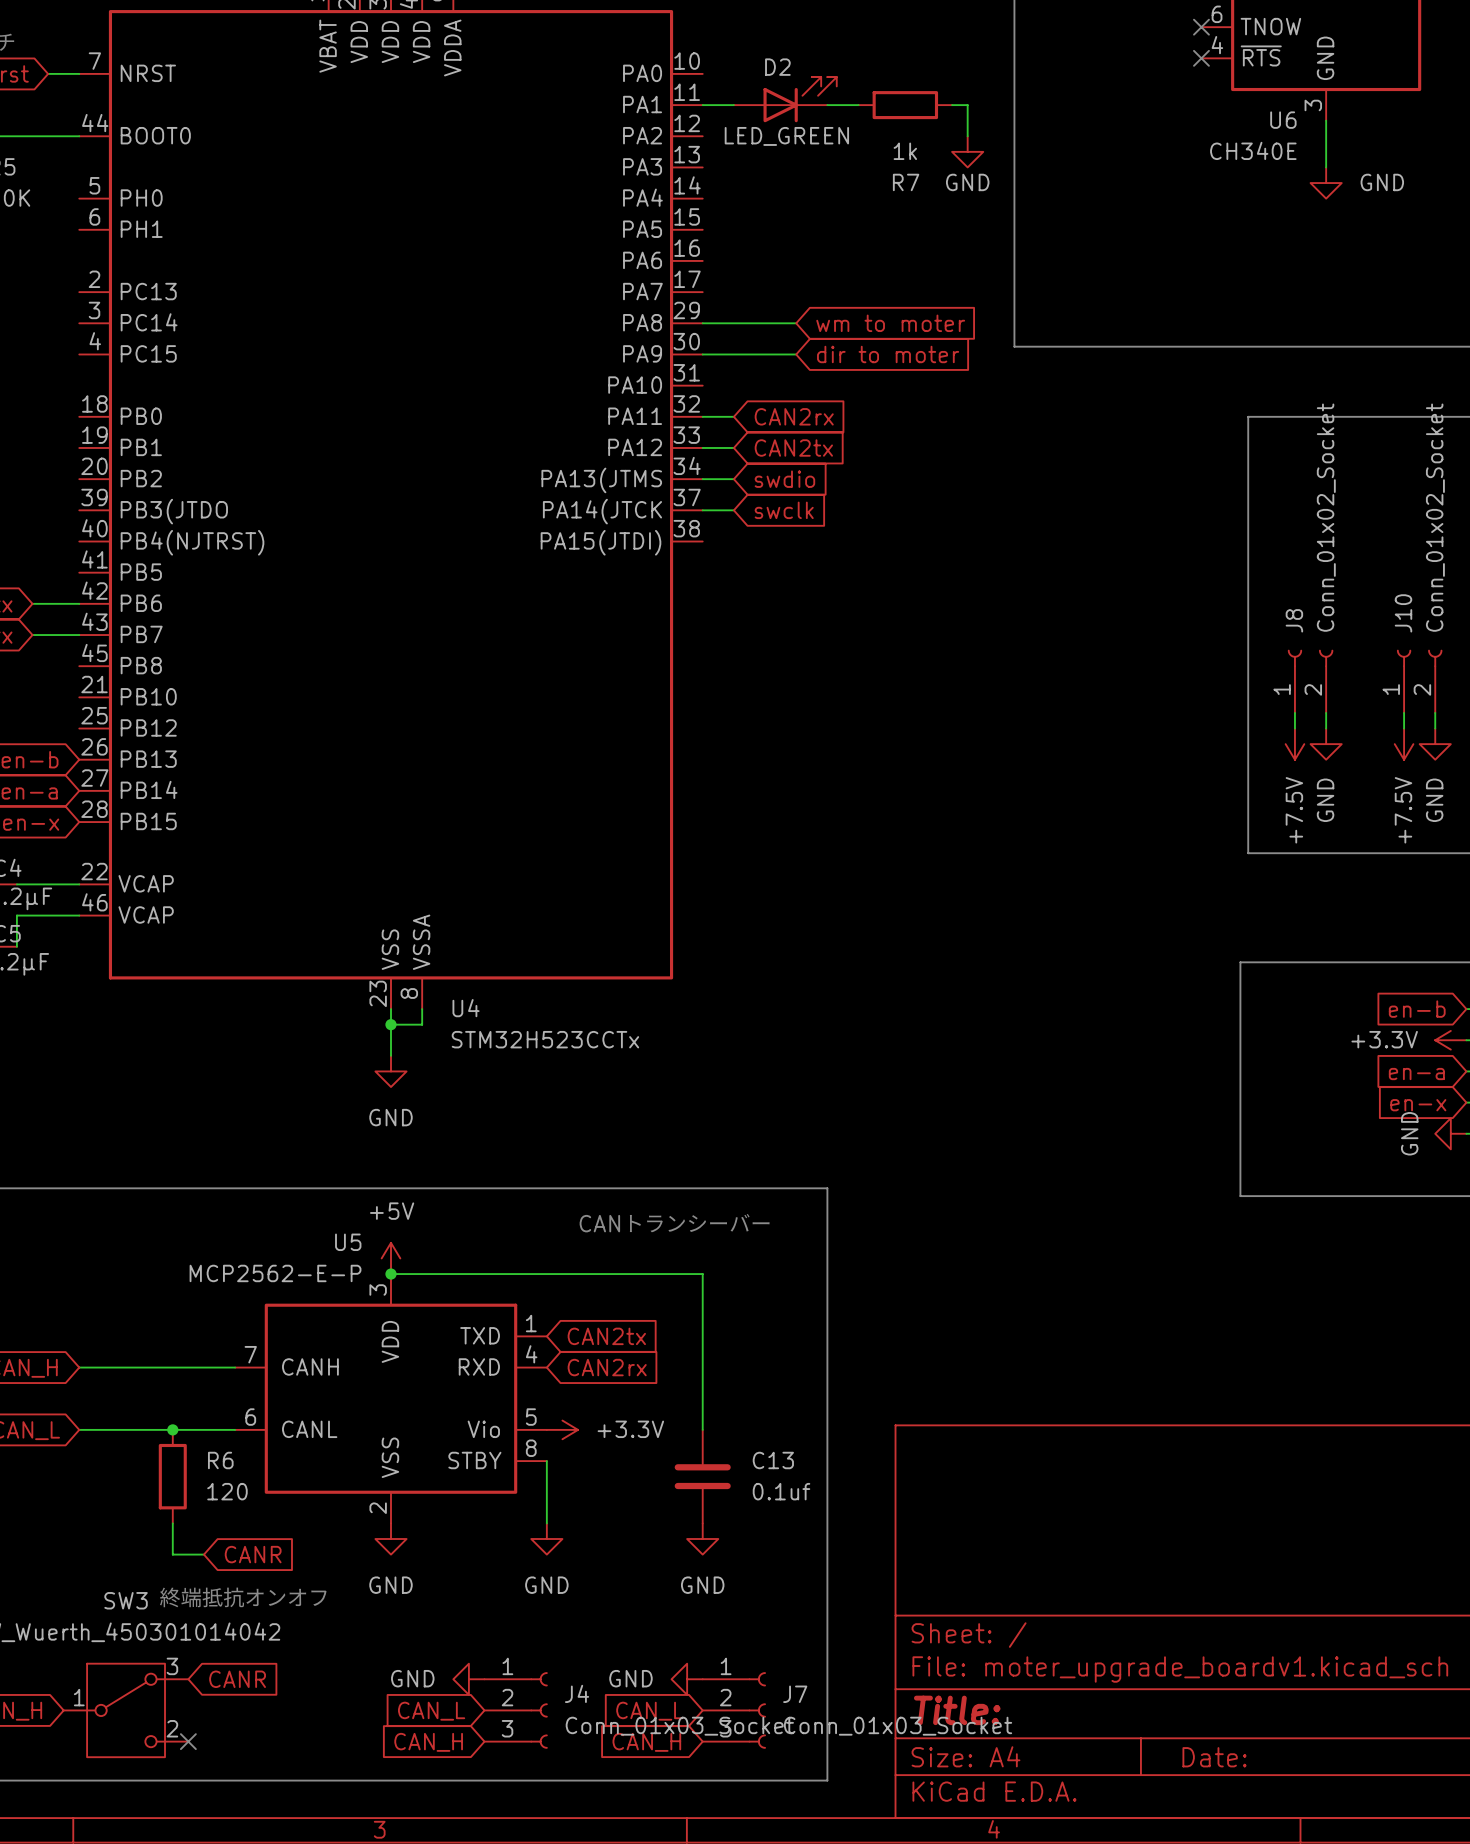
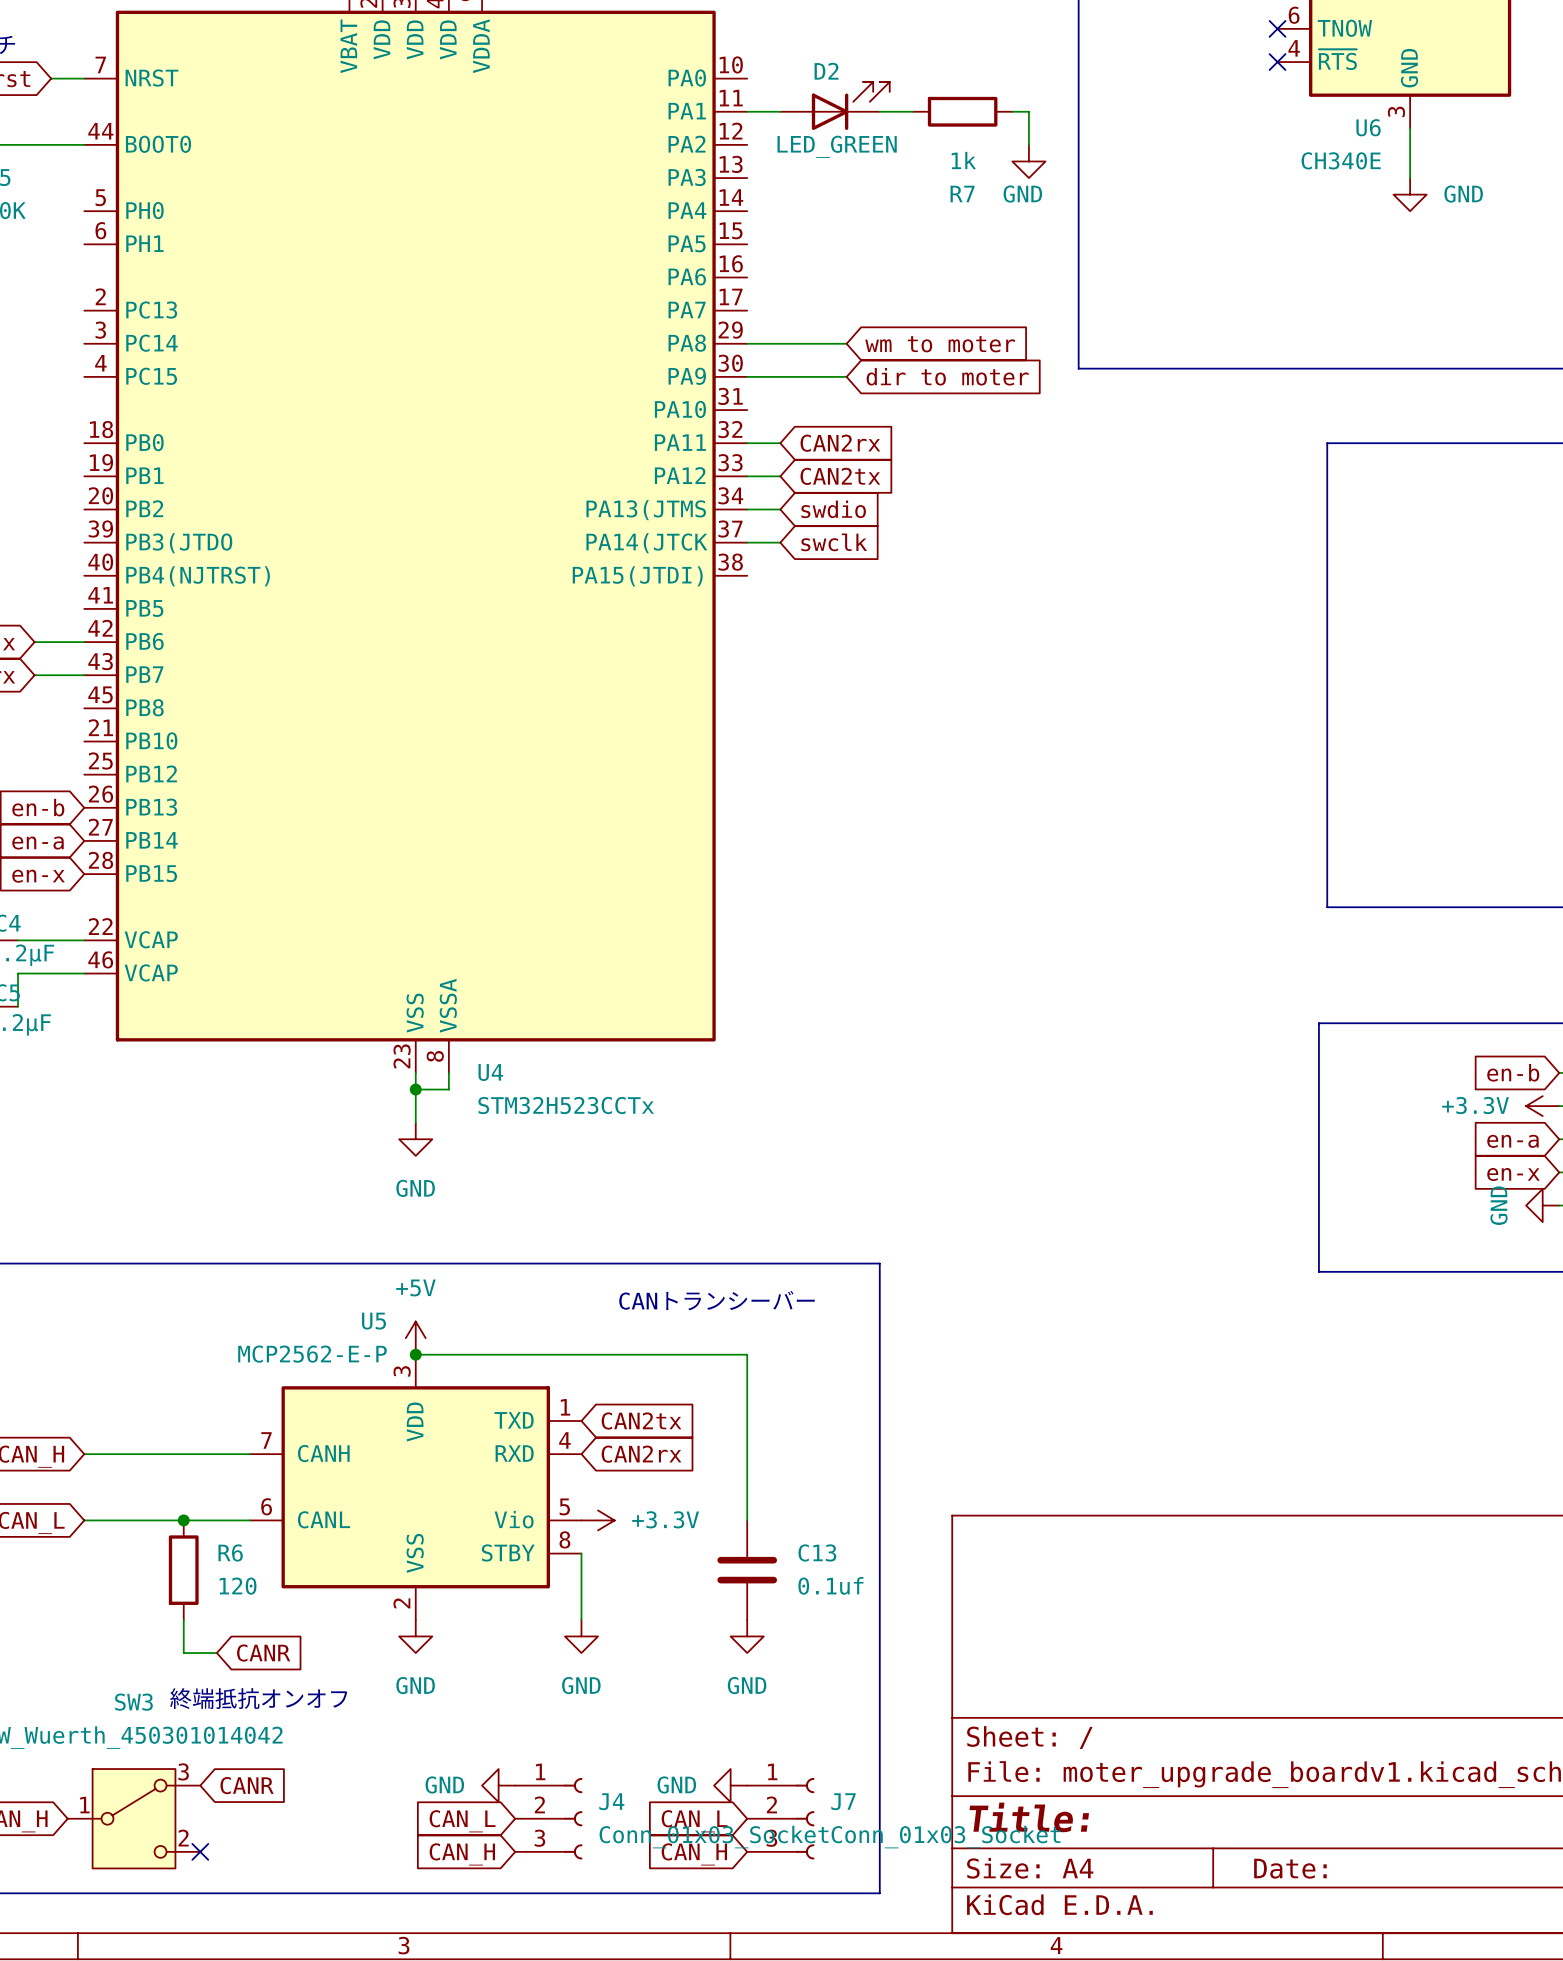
J8: Conn_01x02_Socket (1310, 681) -> none
J10: Conn_01x02_Socket (1419, 681) -> none
wire: (1294, 712) (1294, 728) -> none
wire: (1326, 712) (1326, 728) -> none
wire: (1404, 712) (1404, 728) -> none
wire: (1435, 712) (1435, 728) -> none
power symbol: +7.5V (1294, 744) -> none
power symbol: GND (1326, 744) -> none
power symbol: +7.5V (1404, 744) -> none
power symbol: GND (1435, 744) -> none

